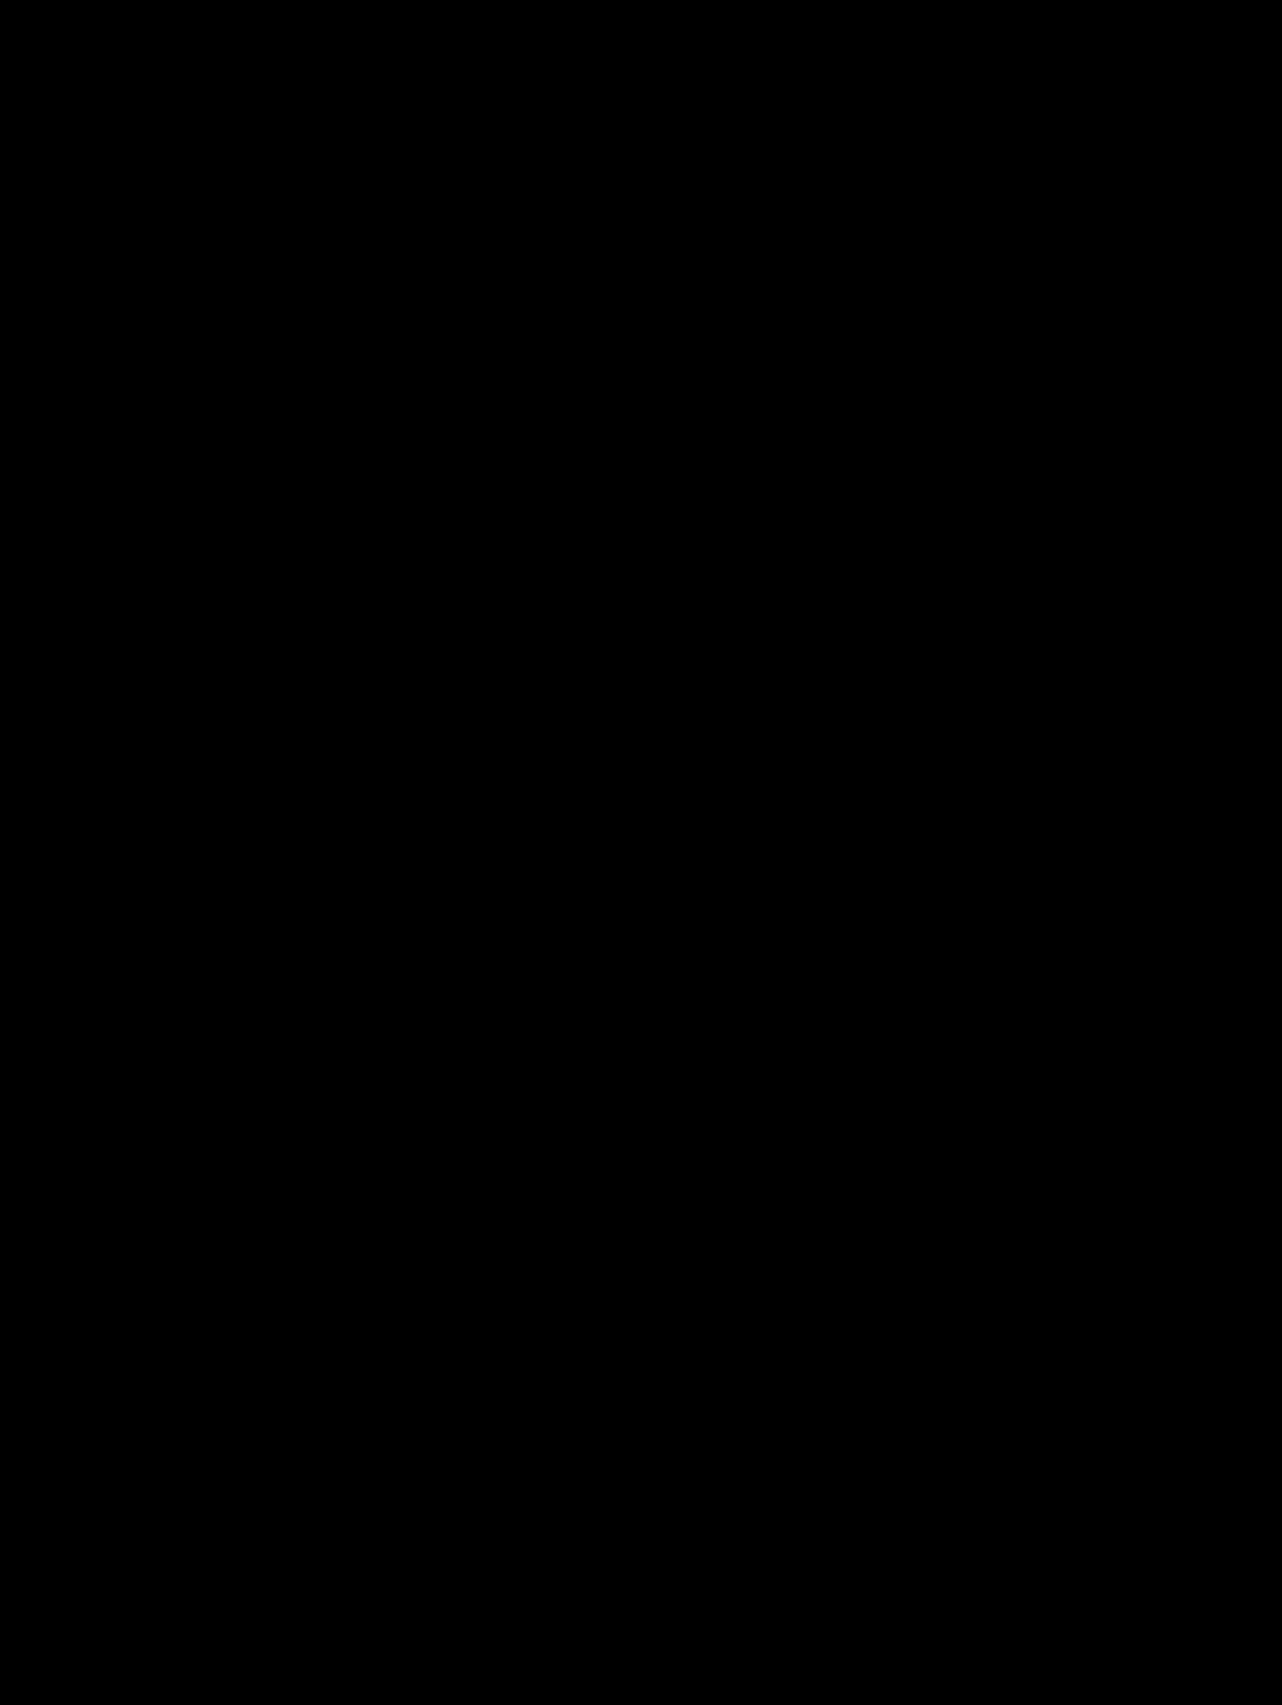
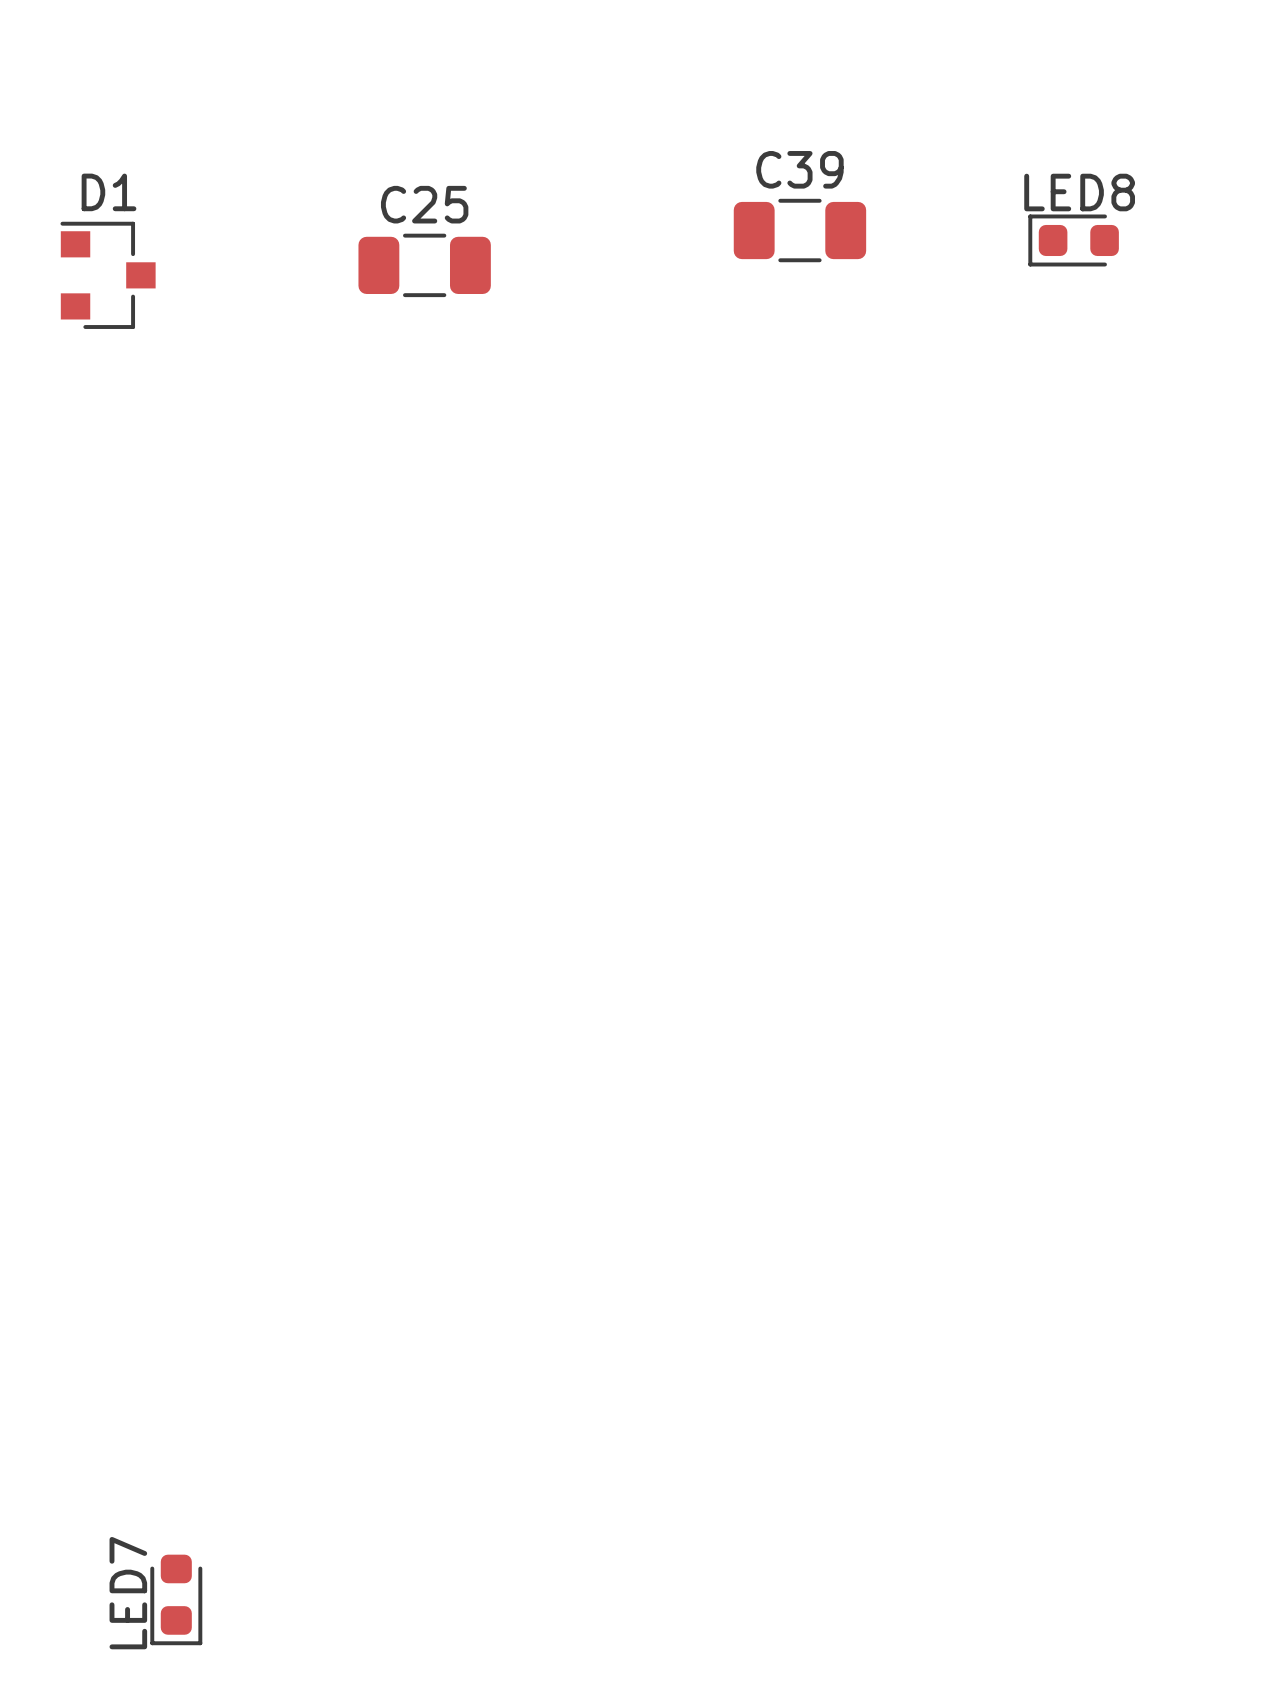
C39: none -> (799, 230)
LED8: none -> (1073, 240)
C25: none -> (424, 265)
D1: none -> (108, 275)
LED7: none -> (176, 1599)

